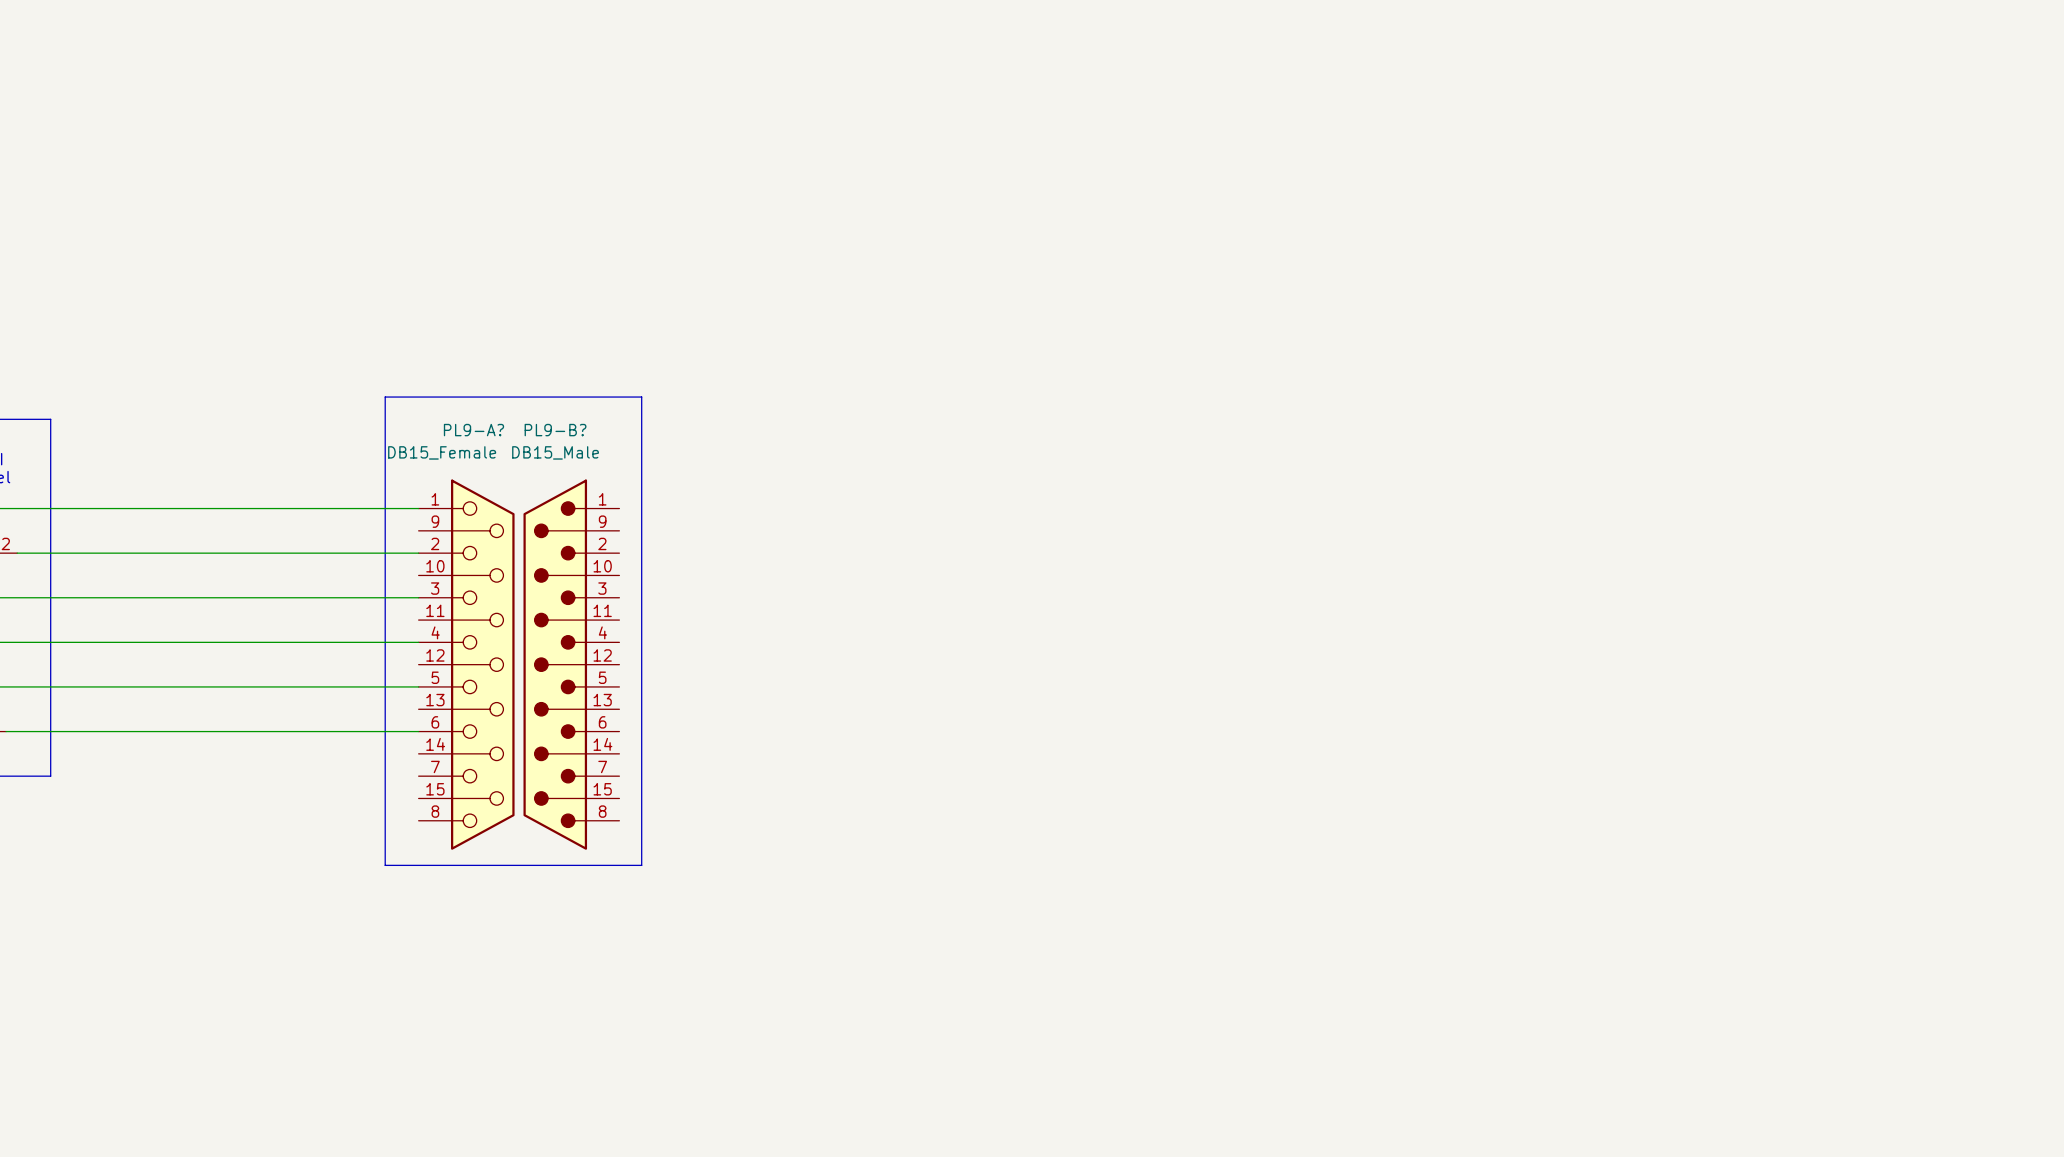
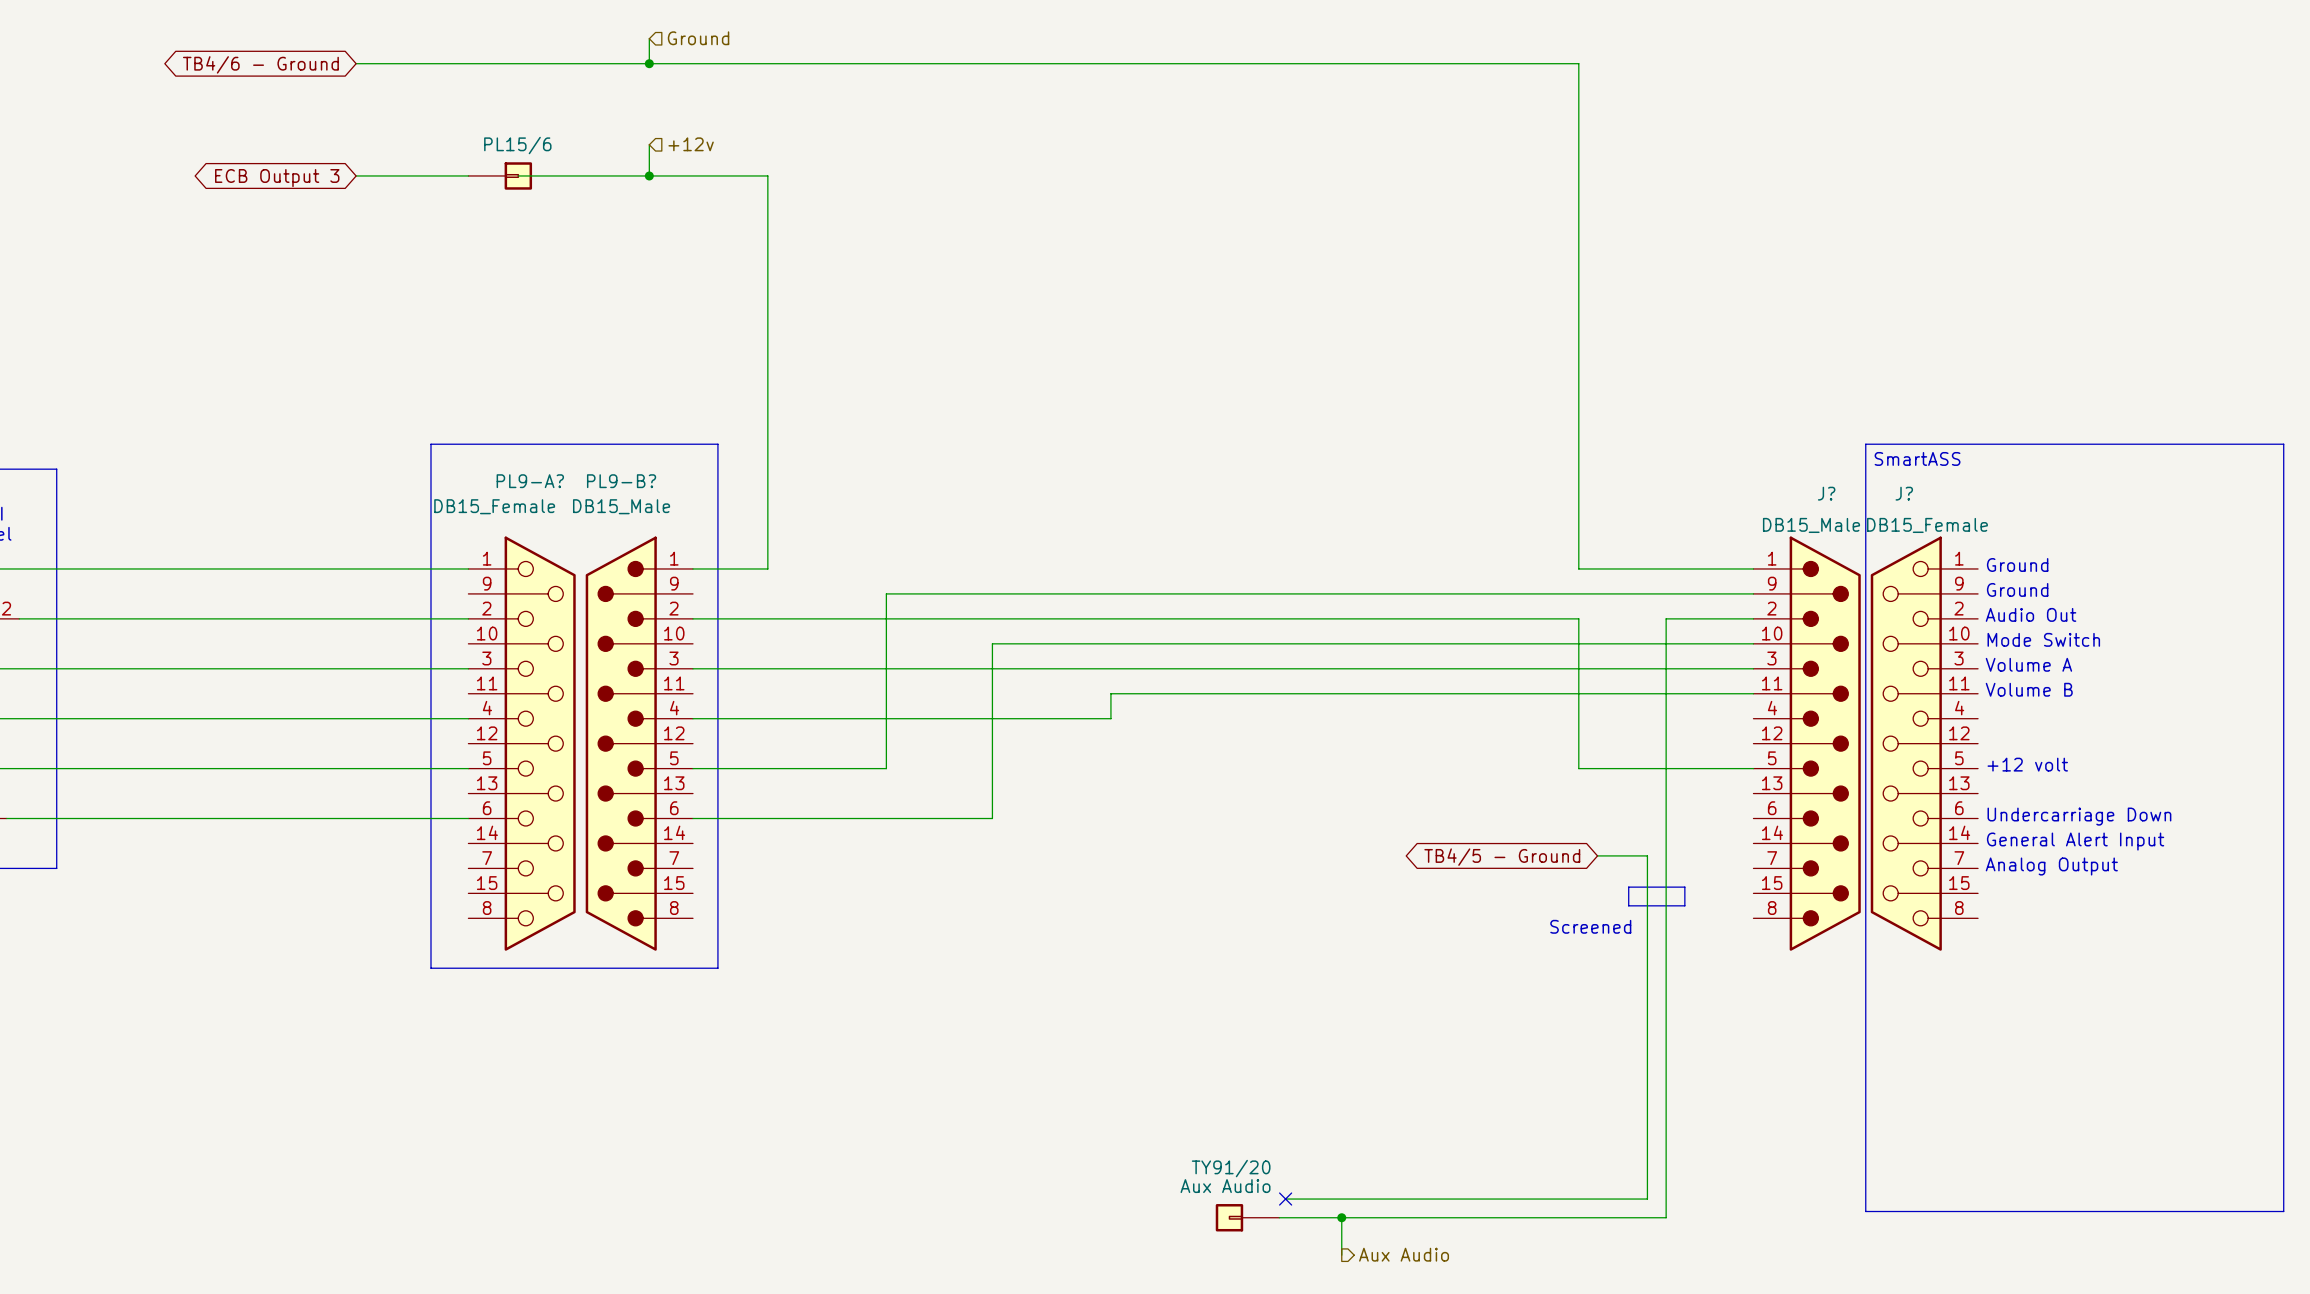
wire: none -> (649, 38) (649, 63)
hierarchical label: none -> Ground (698, 38)
wire: none -> (356, 63) (1578, 63) (1578, 568) (1753, 568)
junction: none -> (649, 63)
global label: none -> TB4/6 - Ground (260, 64)
hierarchical label: none -> +12v (691, 144)
wire: none -> (649, 144) (649, 175)
wire: none -> (356, 175) (468, 175)
PL15/6: none -> (500, 175)
wire: none -> (518, 175) (767, 175) (767, 568) (692, 568)
junction: none -> (649, 175)
global label: none -> ECB Output 3 (277, 178)
line: none -> (1865, 444) (2283, 444) (2283, 1211) (1865, 1211) (1865, 444)
text: none -> SmartASS (1917, 458)
text: none -> Ground (2017, 565)
text: none -> Ground (2017, 589)
wire: none -> (1753, 593) (886, 593) (886, 768) (692, 768)
text: none -> Audio Out (2031, 614)
wire: none -> (692, 618) (1578, 618) (1578, 768) (1753, 768)
wire: none -> (1753, 618) (1666, 618) (1666, 1217) (1279, 1217)
text: none -> Mode Switch (2043, 639)
wire: none -> (1753, 643) (992, 643) (992, 818) (692, 818)
text: none -> Volume A (2028, 664)
wire: none -> (692, 668) (1753, 668)
text: none -> Volume B (2029, 689)
wire: none -> (1753, 693) (1110, 693) (1110, 718) (692, 718)
J?: none -> DB15_Male (1807, 743)
J?: none -> DB15_Female (1924, 743)
text: none -> +12 volt (2027, 764)
text: none -> Undercarriage Down (2079, 816)
text: none -> General Alert Input (2075, 841)
wire: none -> (1597, 855) (1647, 855) (1647, 1199) (1285, 1199)
global label: none -> TB4/5 - Ground (1502, 857)
text: none -> Analog Output (2051, 866)
line: none -> (1628, 887) (1684, 887) (1684, 905) (1628, 905) (1628, 887)
text: none -> Screened (1590, 926)
no-connect mark: none -> (1285, 1199)
TY91/20: none -> Aux Audio (1247, 1217)
wire: none -> (1341, 1217) (1341, 1255)
junction: none -> (1341, 1217)
hierarchical label: none -> Aux Audio (1404, 1254)

